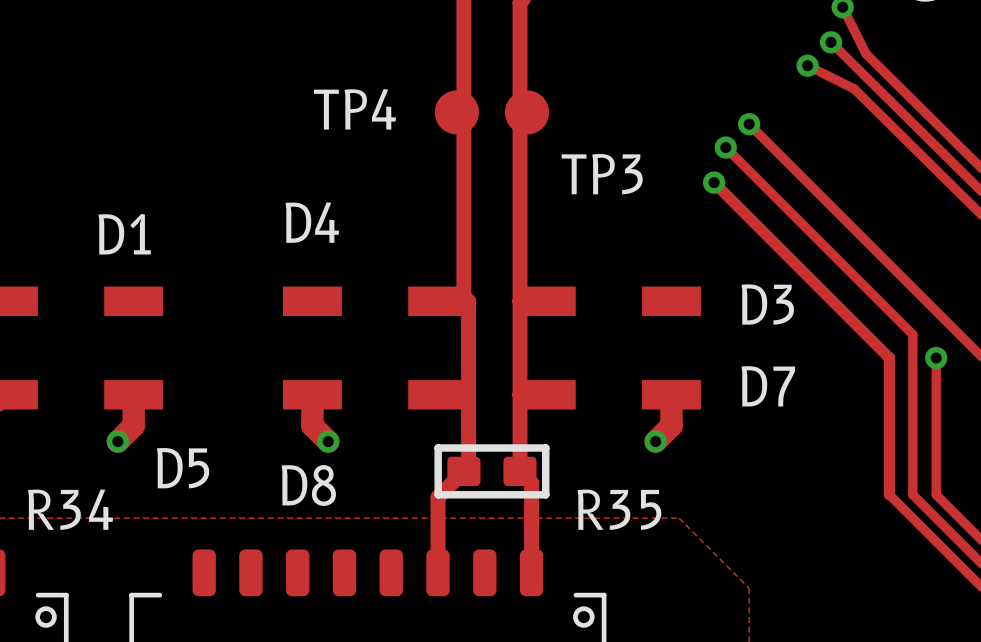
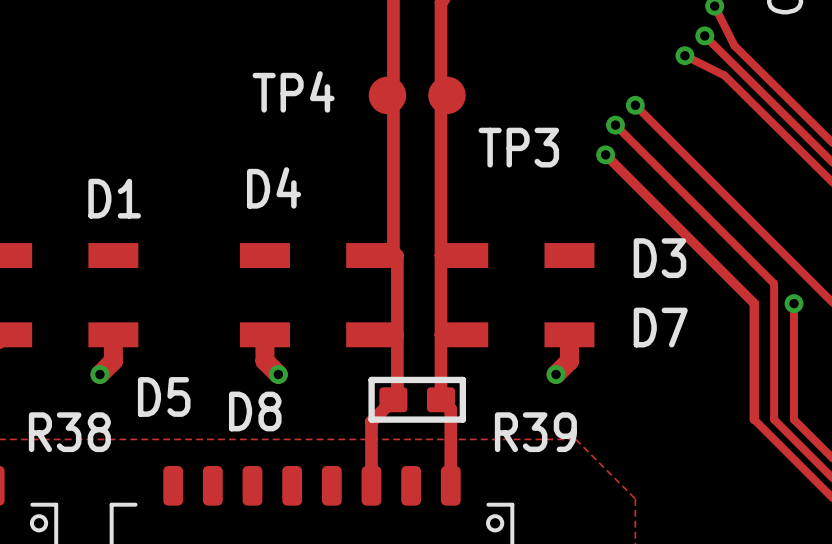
R34 name: R34 (70, 509) -> R38 (69, 432)
R35 name: R35 (619, 509) -> R39 (535, 432)

